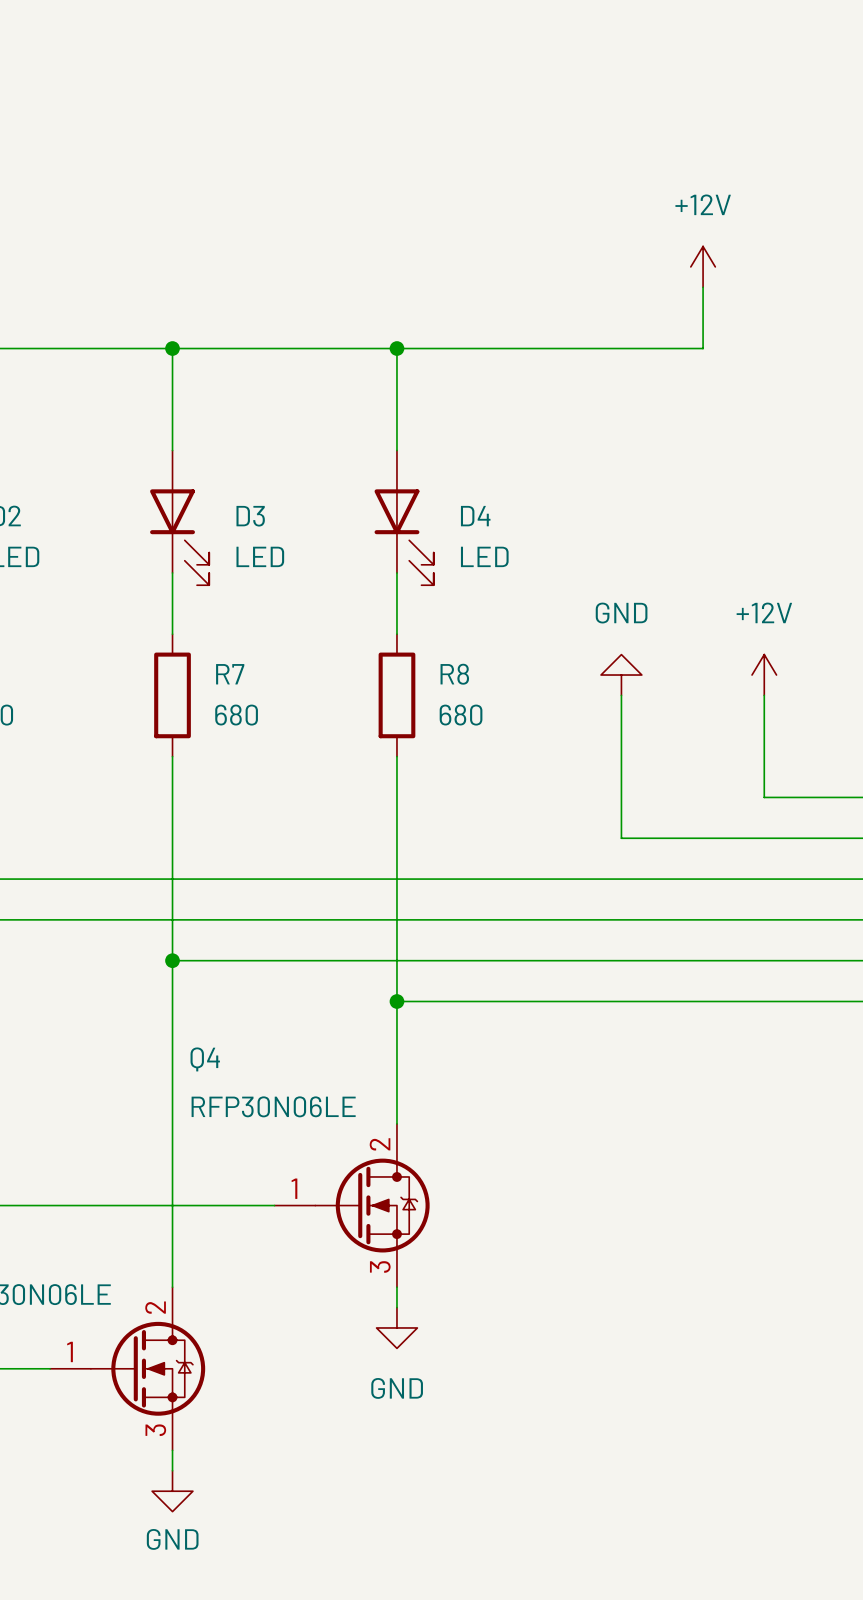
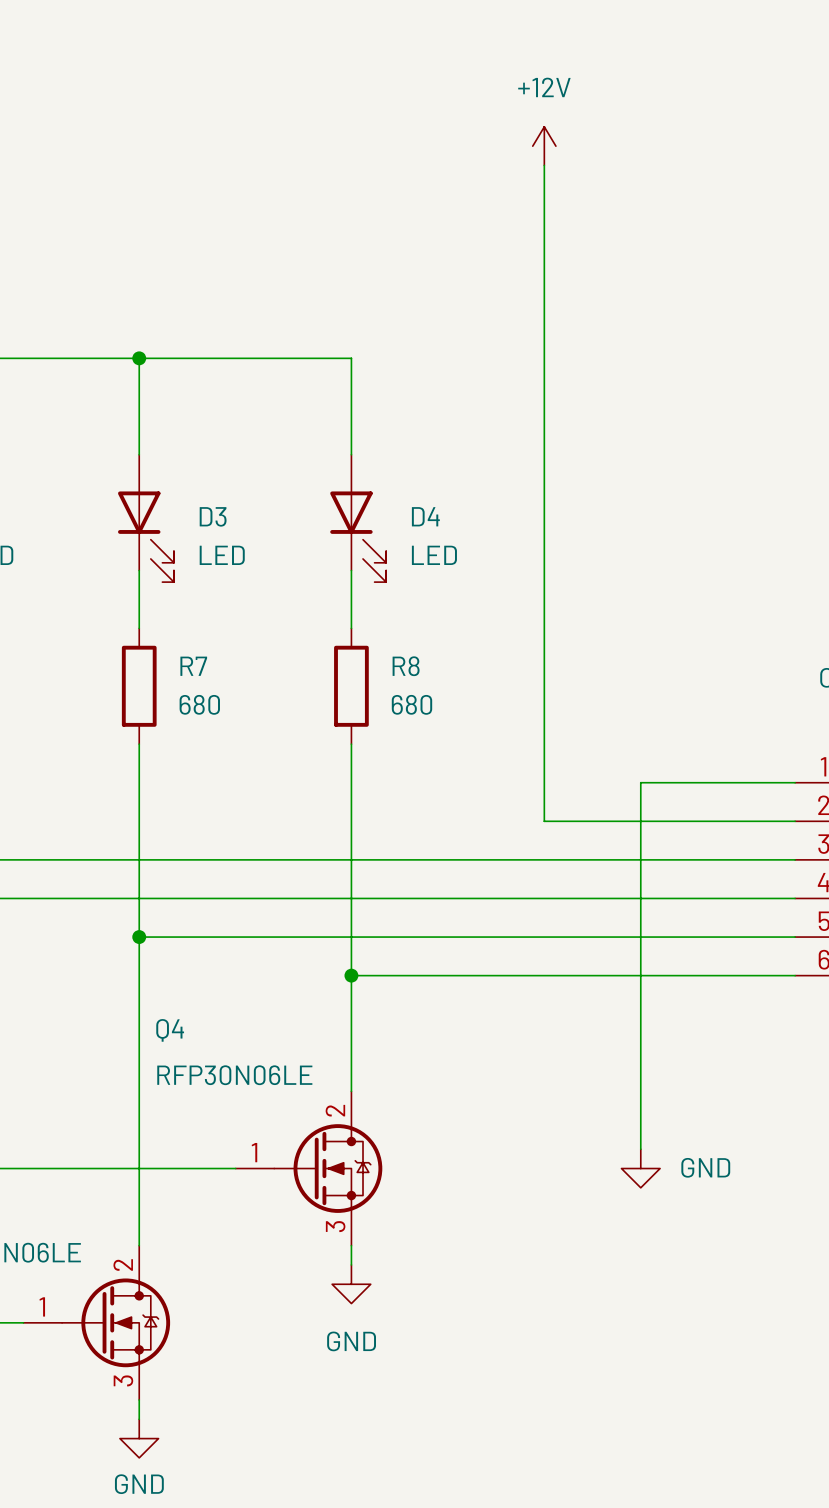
power symbol position: +12V (703, 266) -> +12V (544, 146)
wire: (703, 287) (703, 348) (396, 348) -> none
junction: (396, 348) -> none
power symbol: GND (621, 675) -> none
power symbol: +12V (764, 675) -> none
wire: (621, 695) (621, 838) -> (544, 165) (544, 821) (563, 821)
wire: (764, 695) (764, 797) -> (640, 1149) (640, 782) (698, 782)
power symbol: none -> GND (640, 1168)

